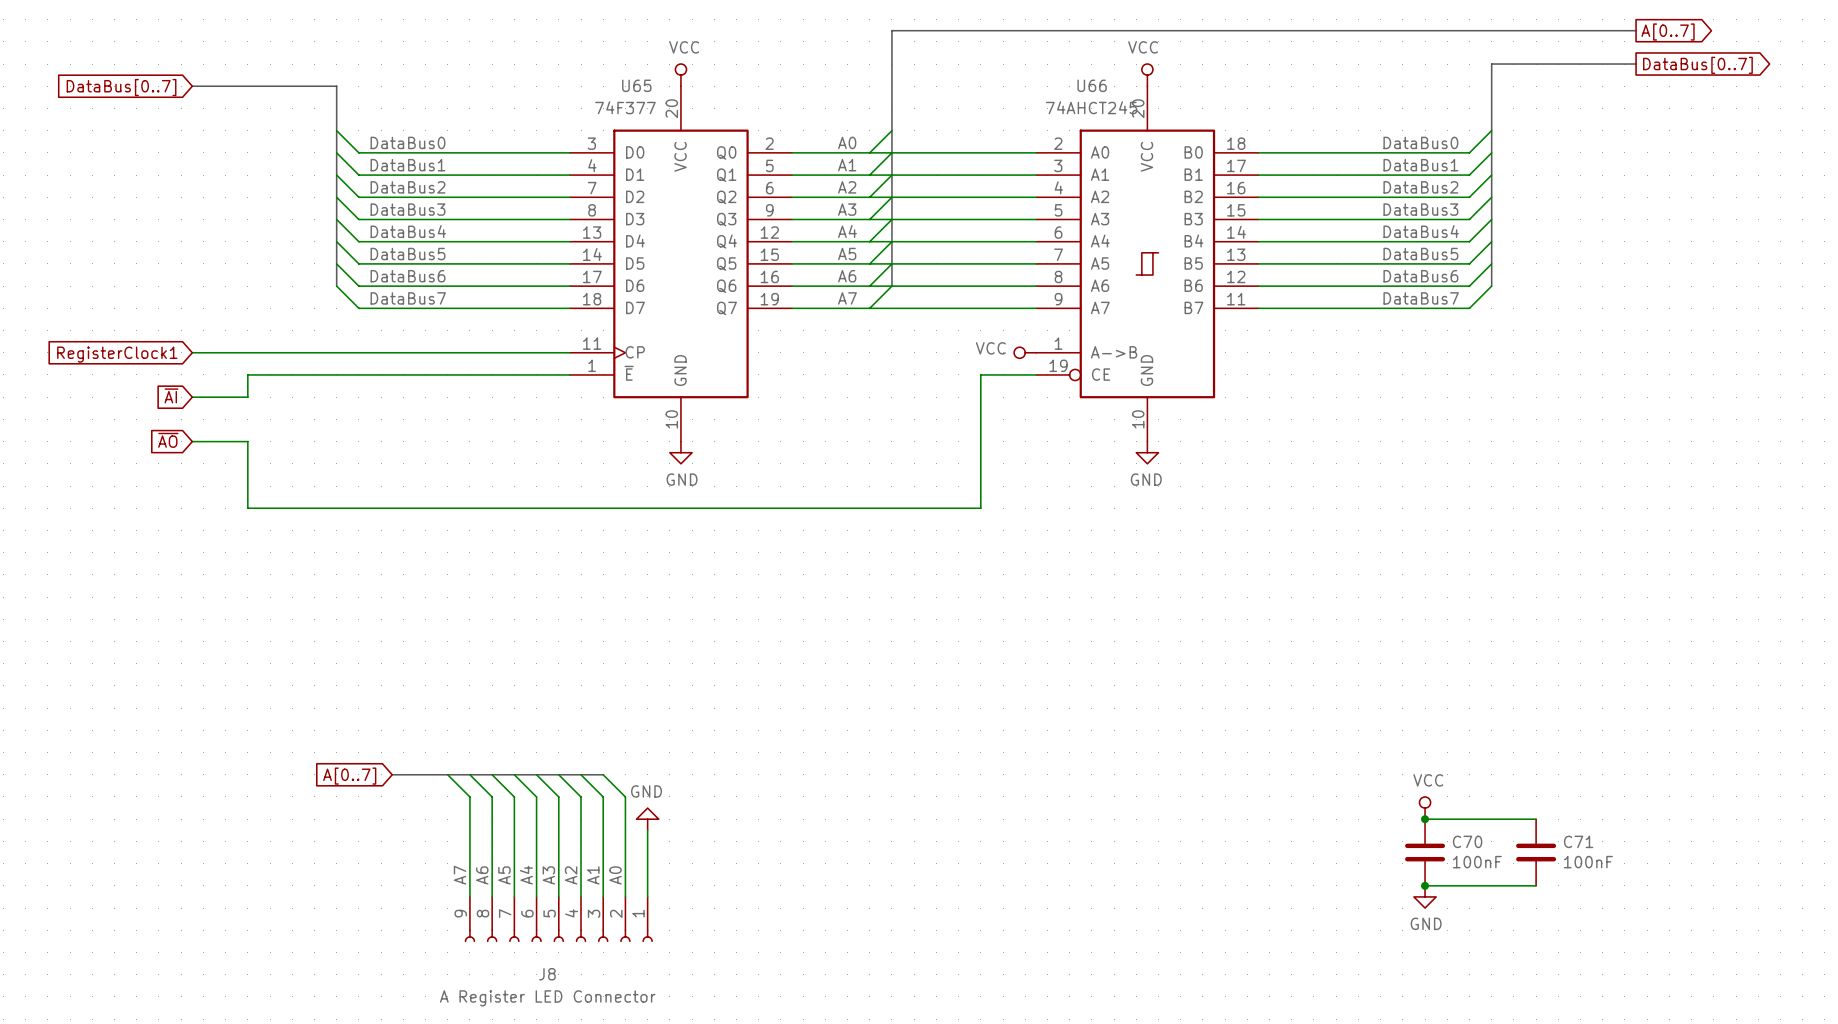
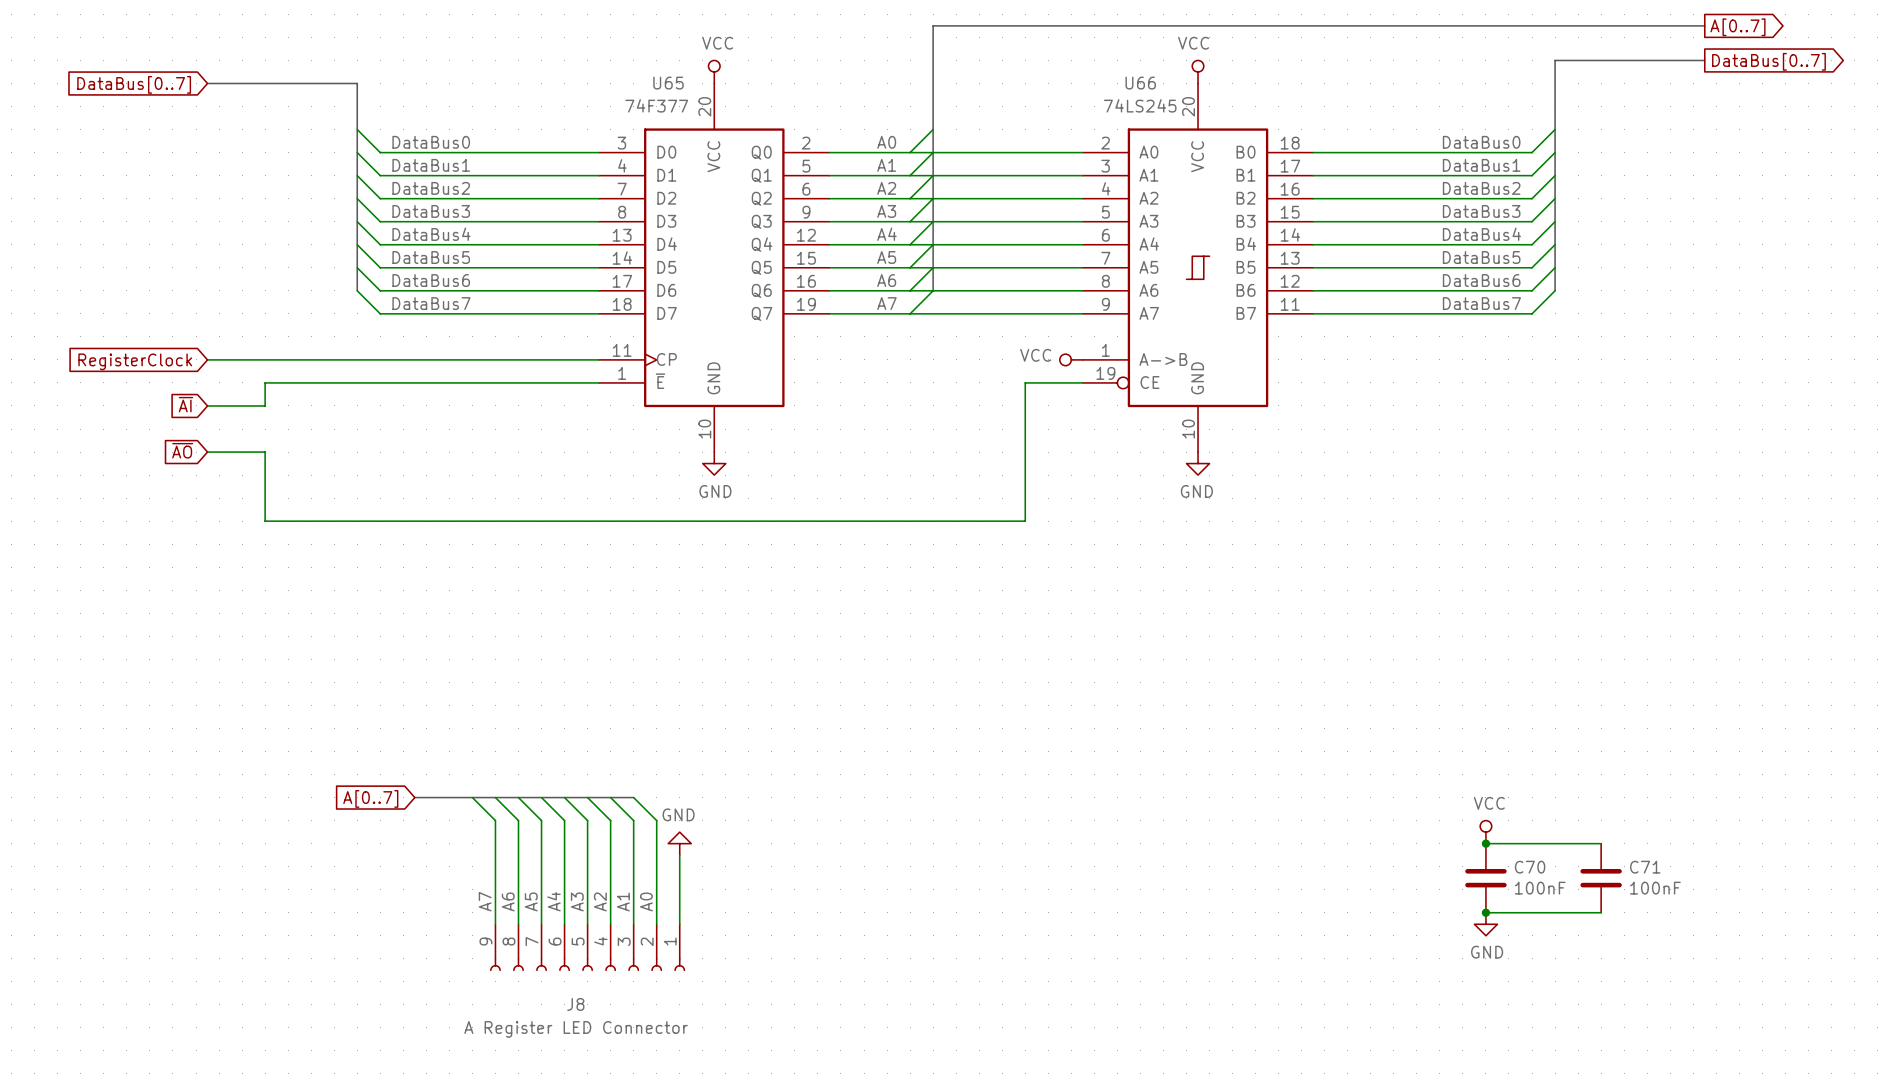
U66 value: 74AHCT245 (1091, 107) -> 74LS245 (1140, 105)
global label: RegisterClock1 (117, 354) -> RegisterClock (135, 361)

